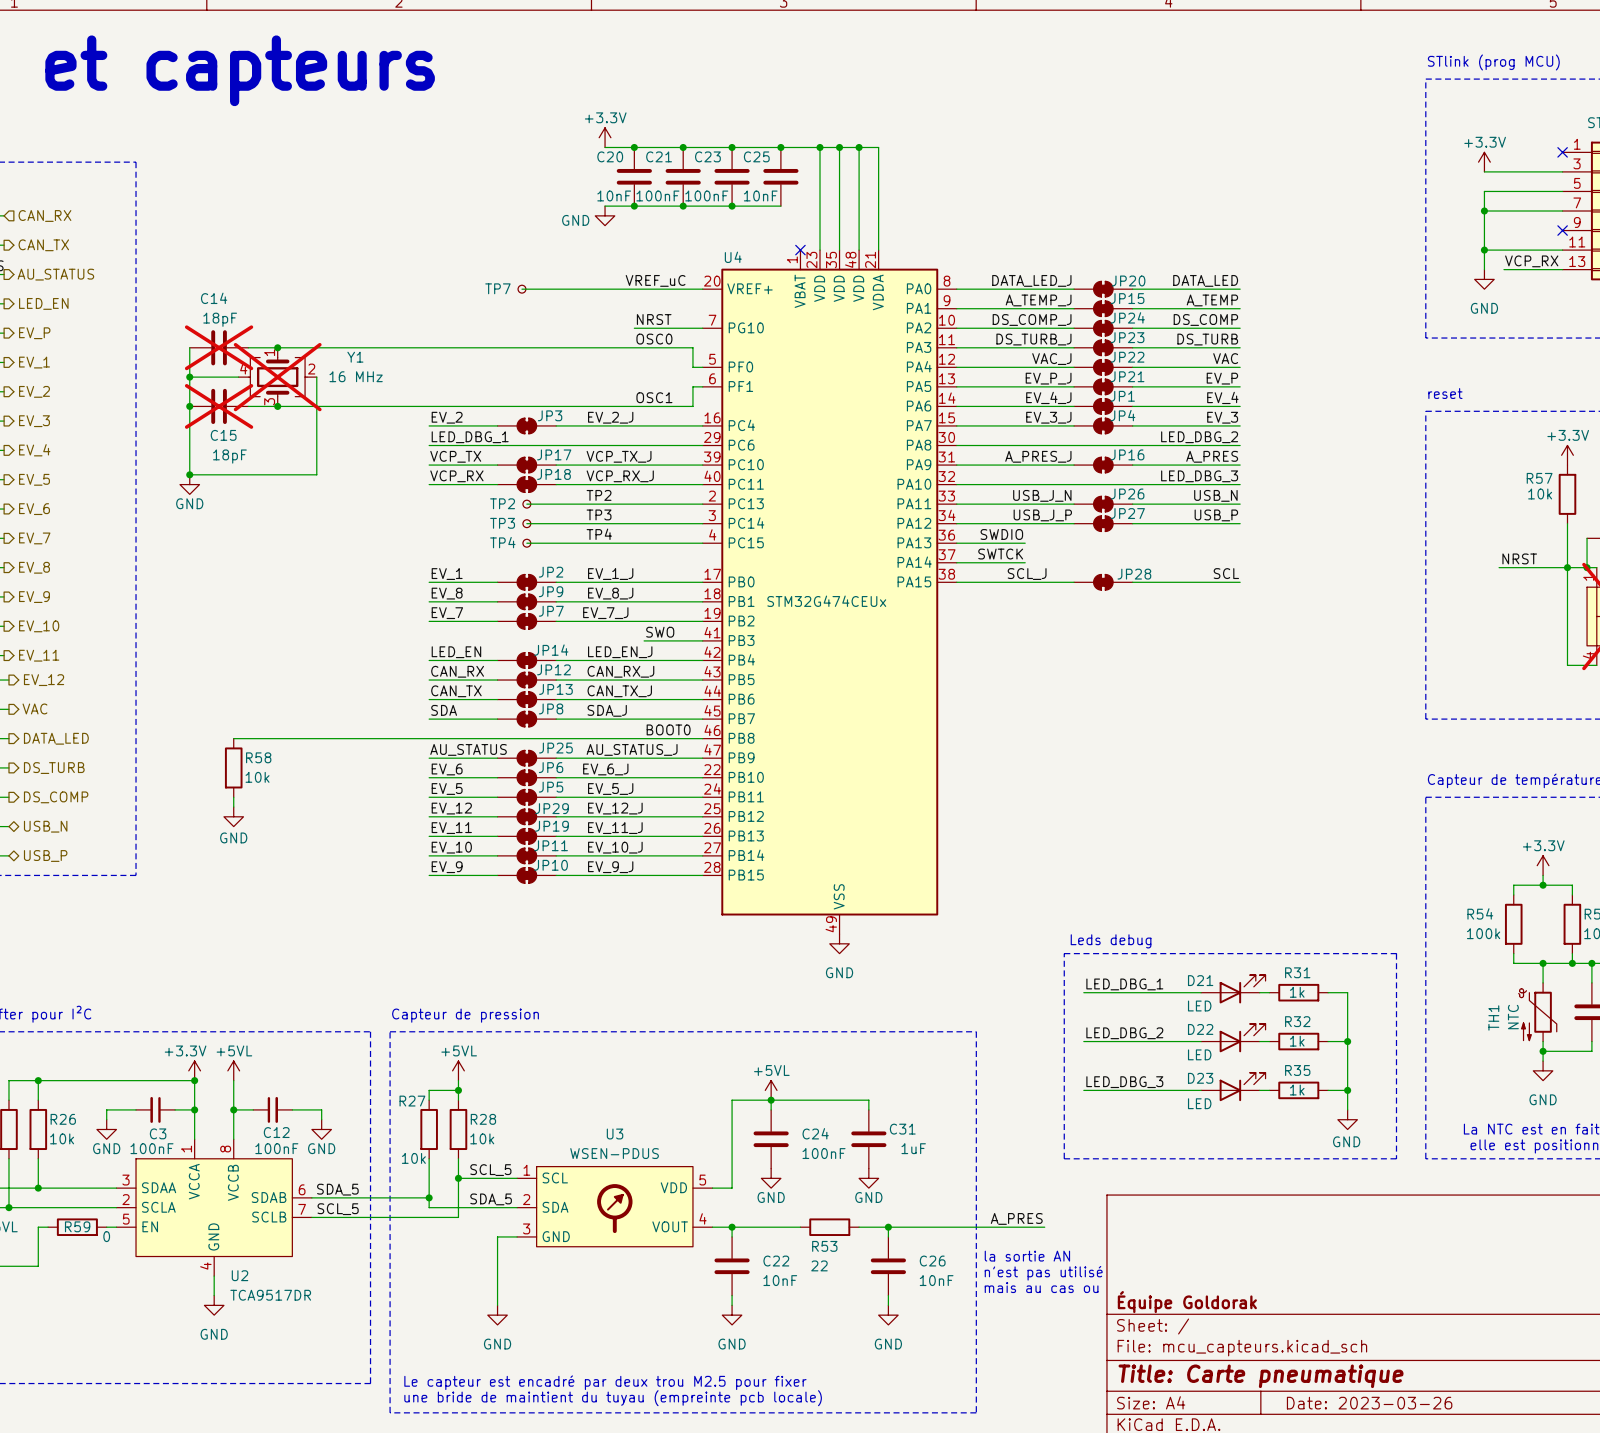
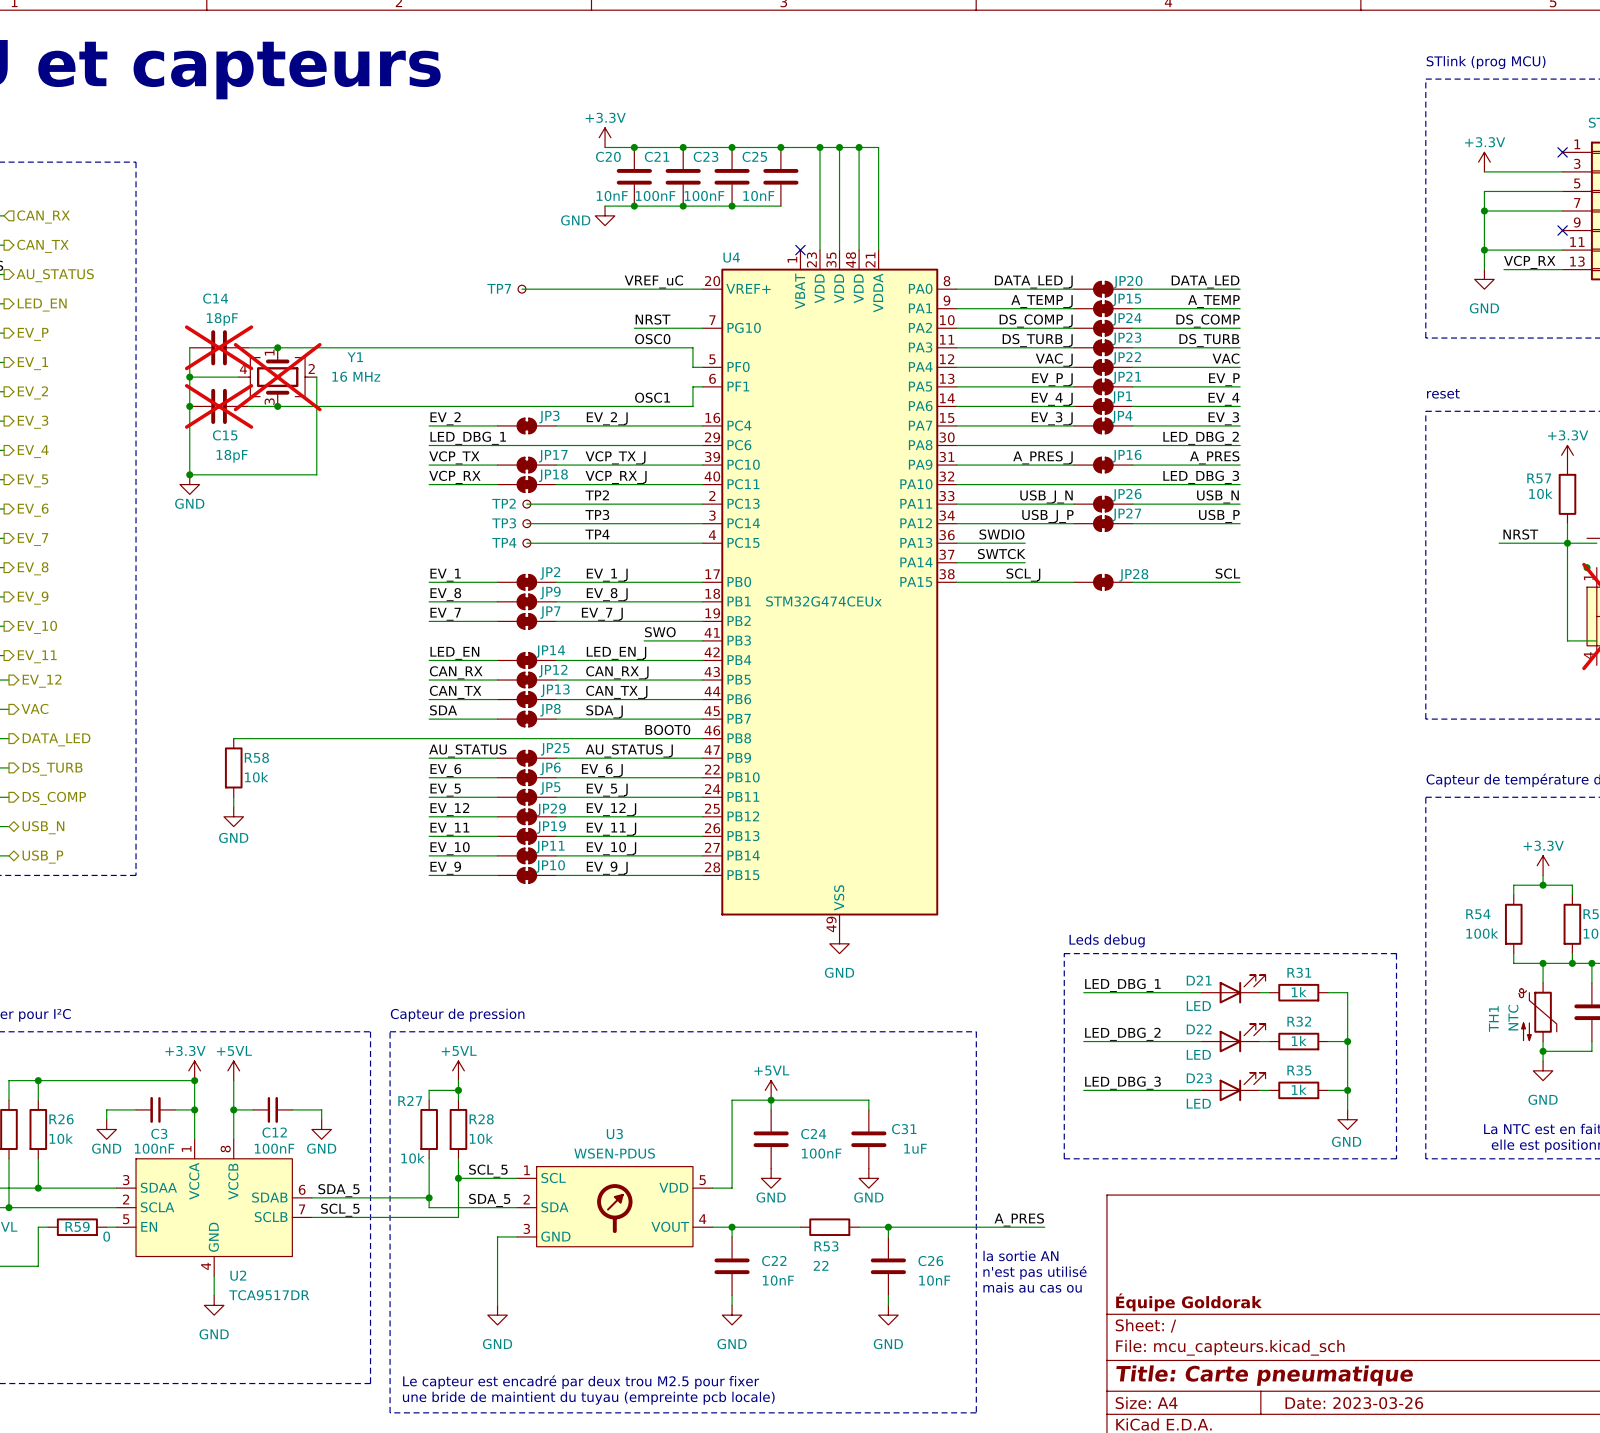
wire: (1587, 538) (1587, 567) -> none
label position: NRST (1519, 558) -> NRST (1520, 534)
wire: (1499, 567) (1596, 567) -> (1499, 543) (1596, 543)
junction position: (1567, 567) -> (1567, 543)
wire: (1567, 640) (1567, 665) (1596, 665) -> (1567, 640) (1596, 640)

